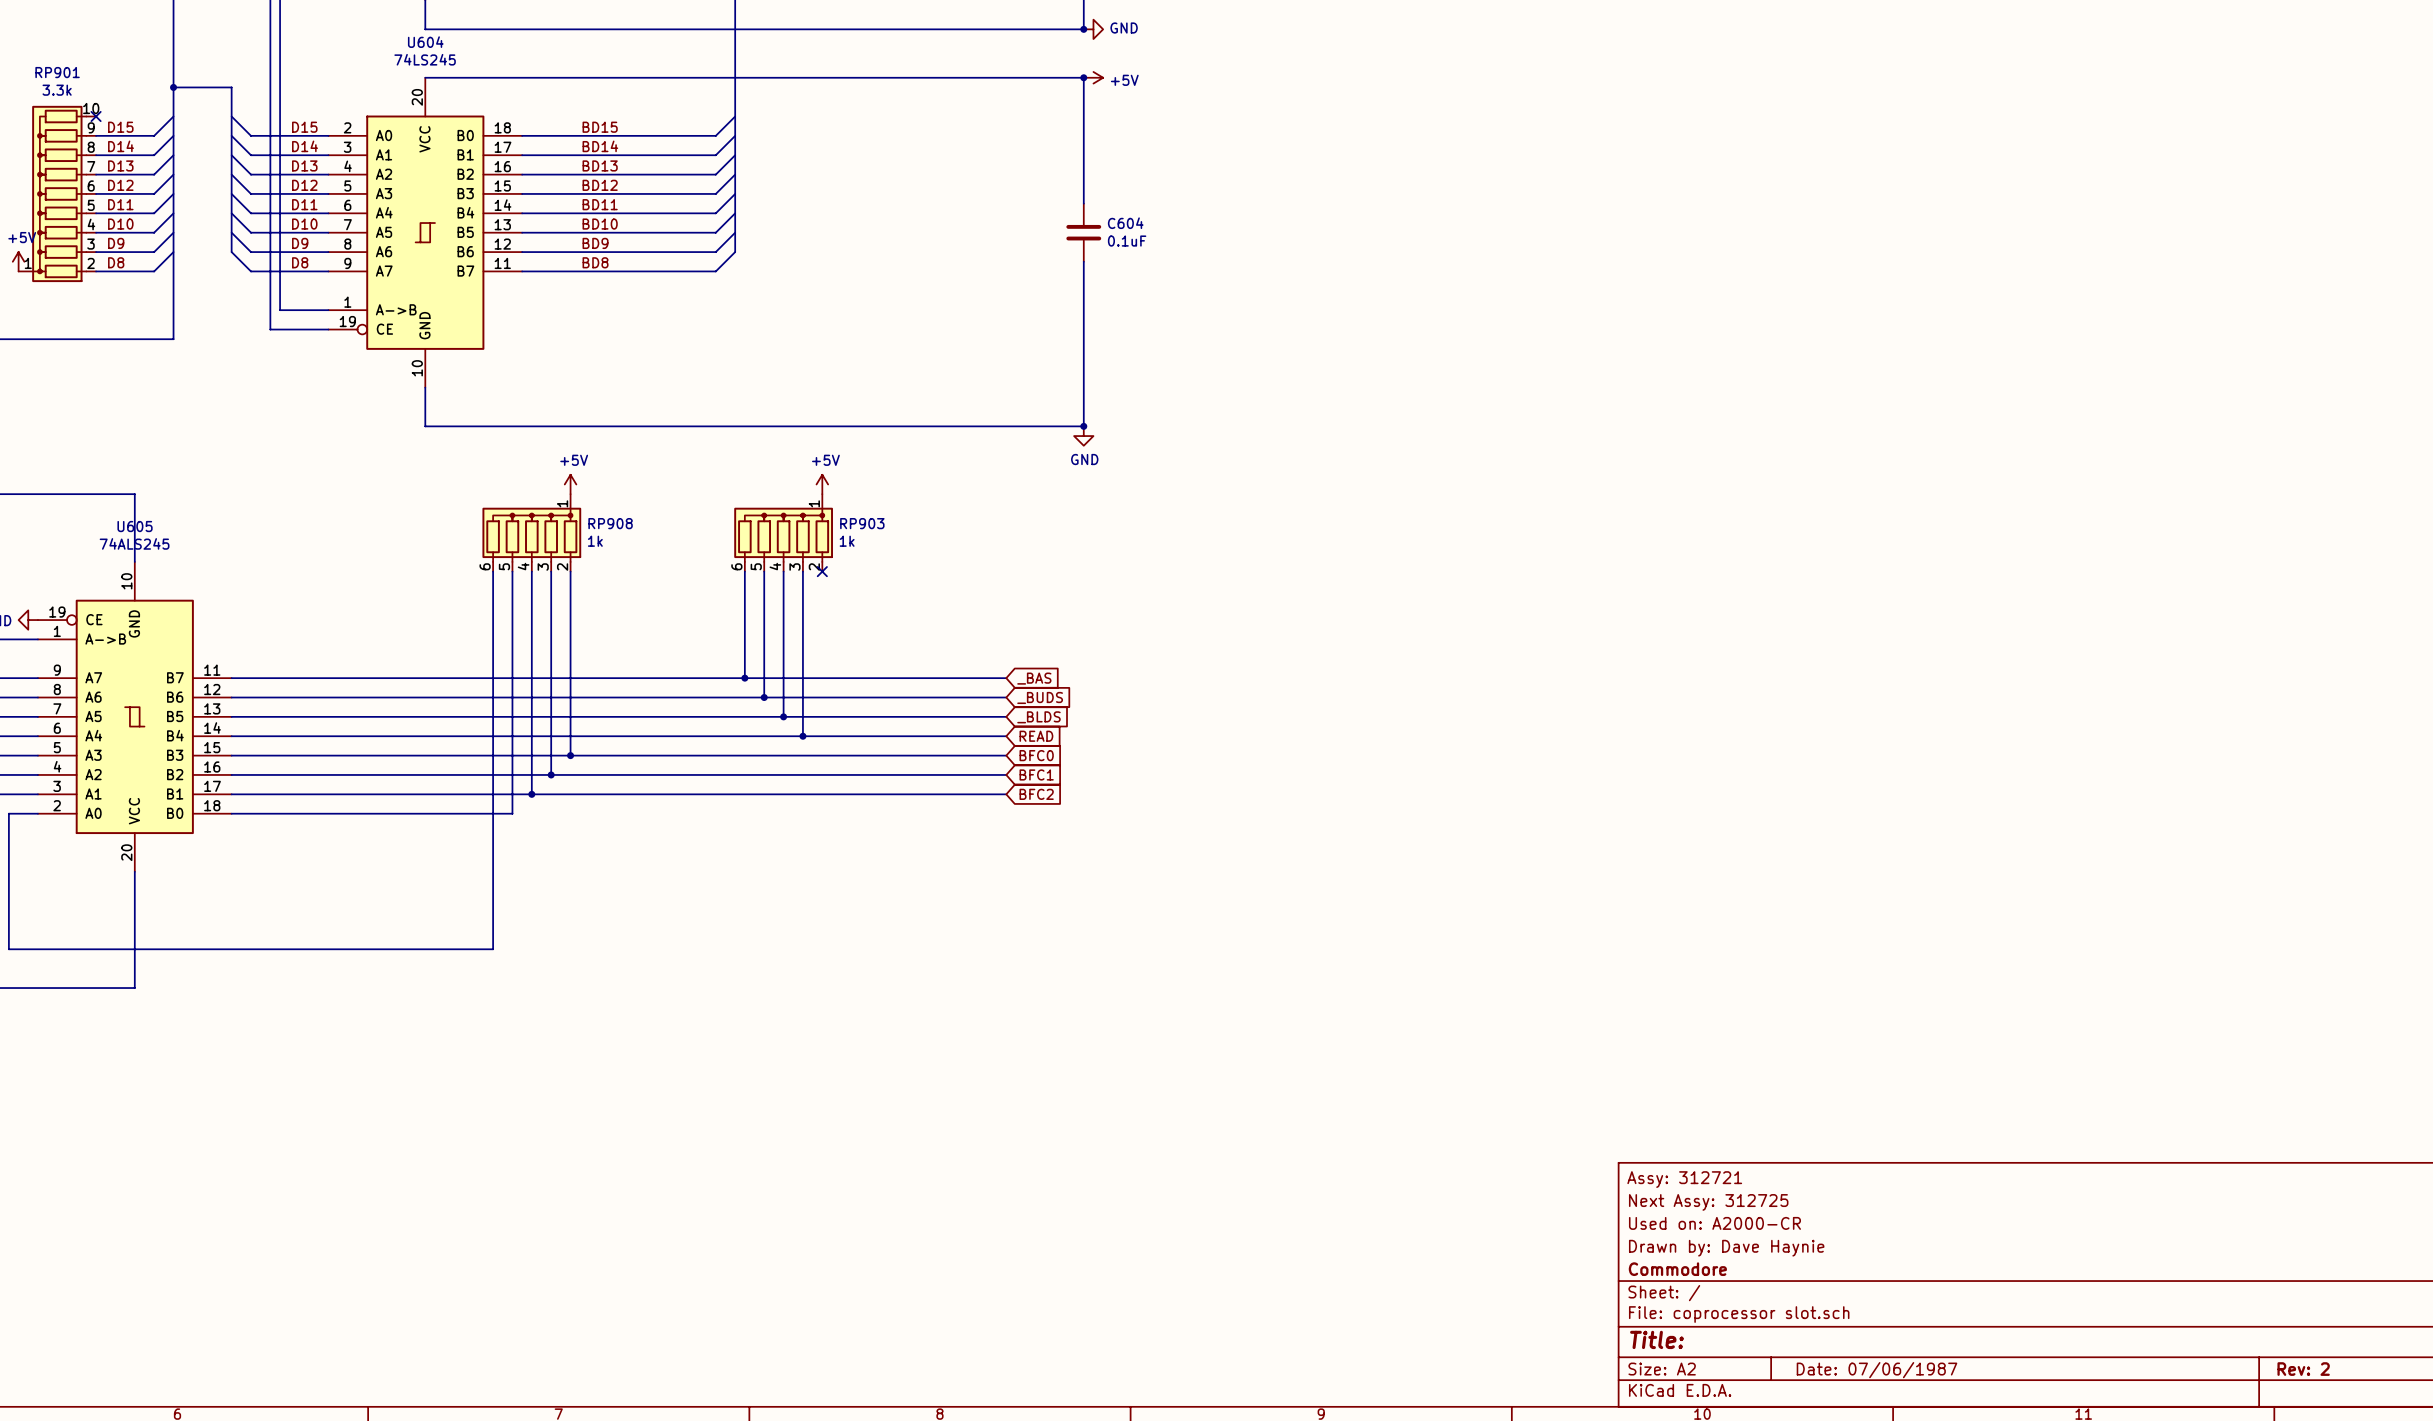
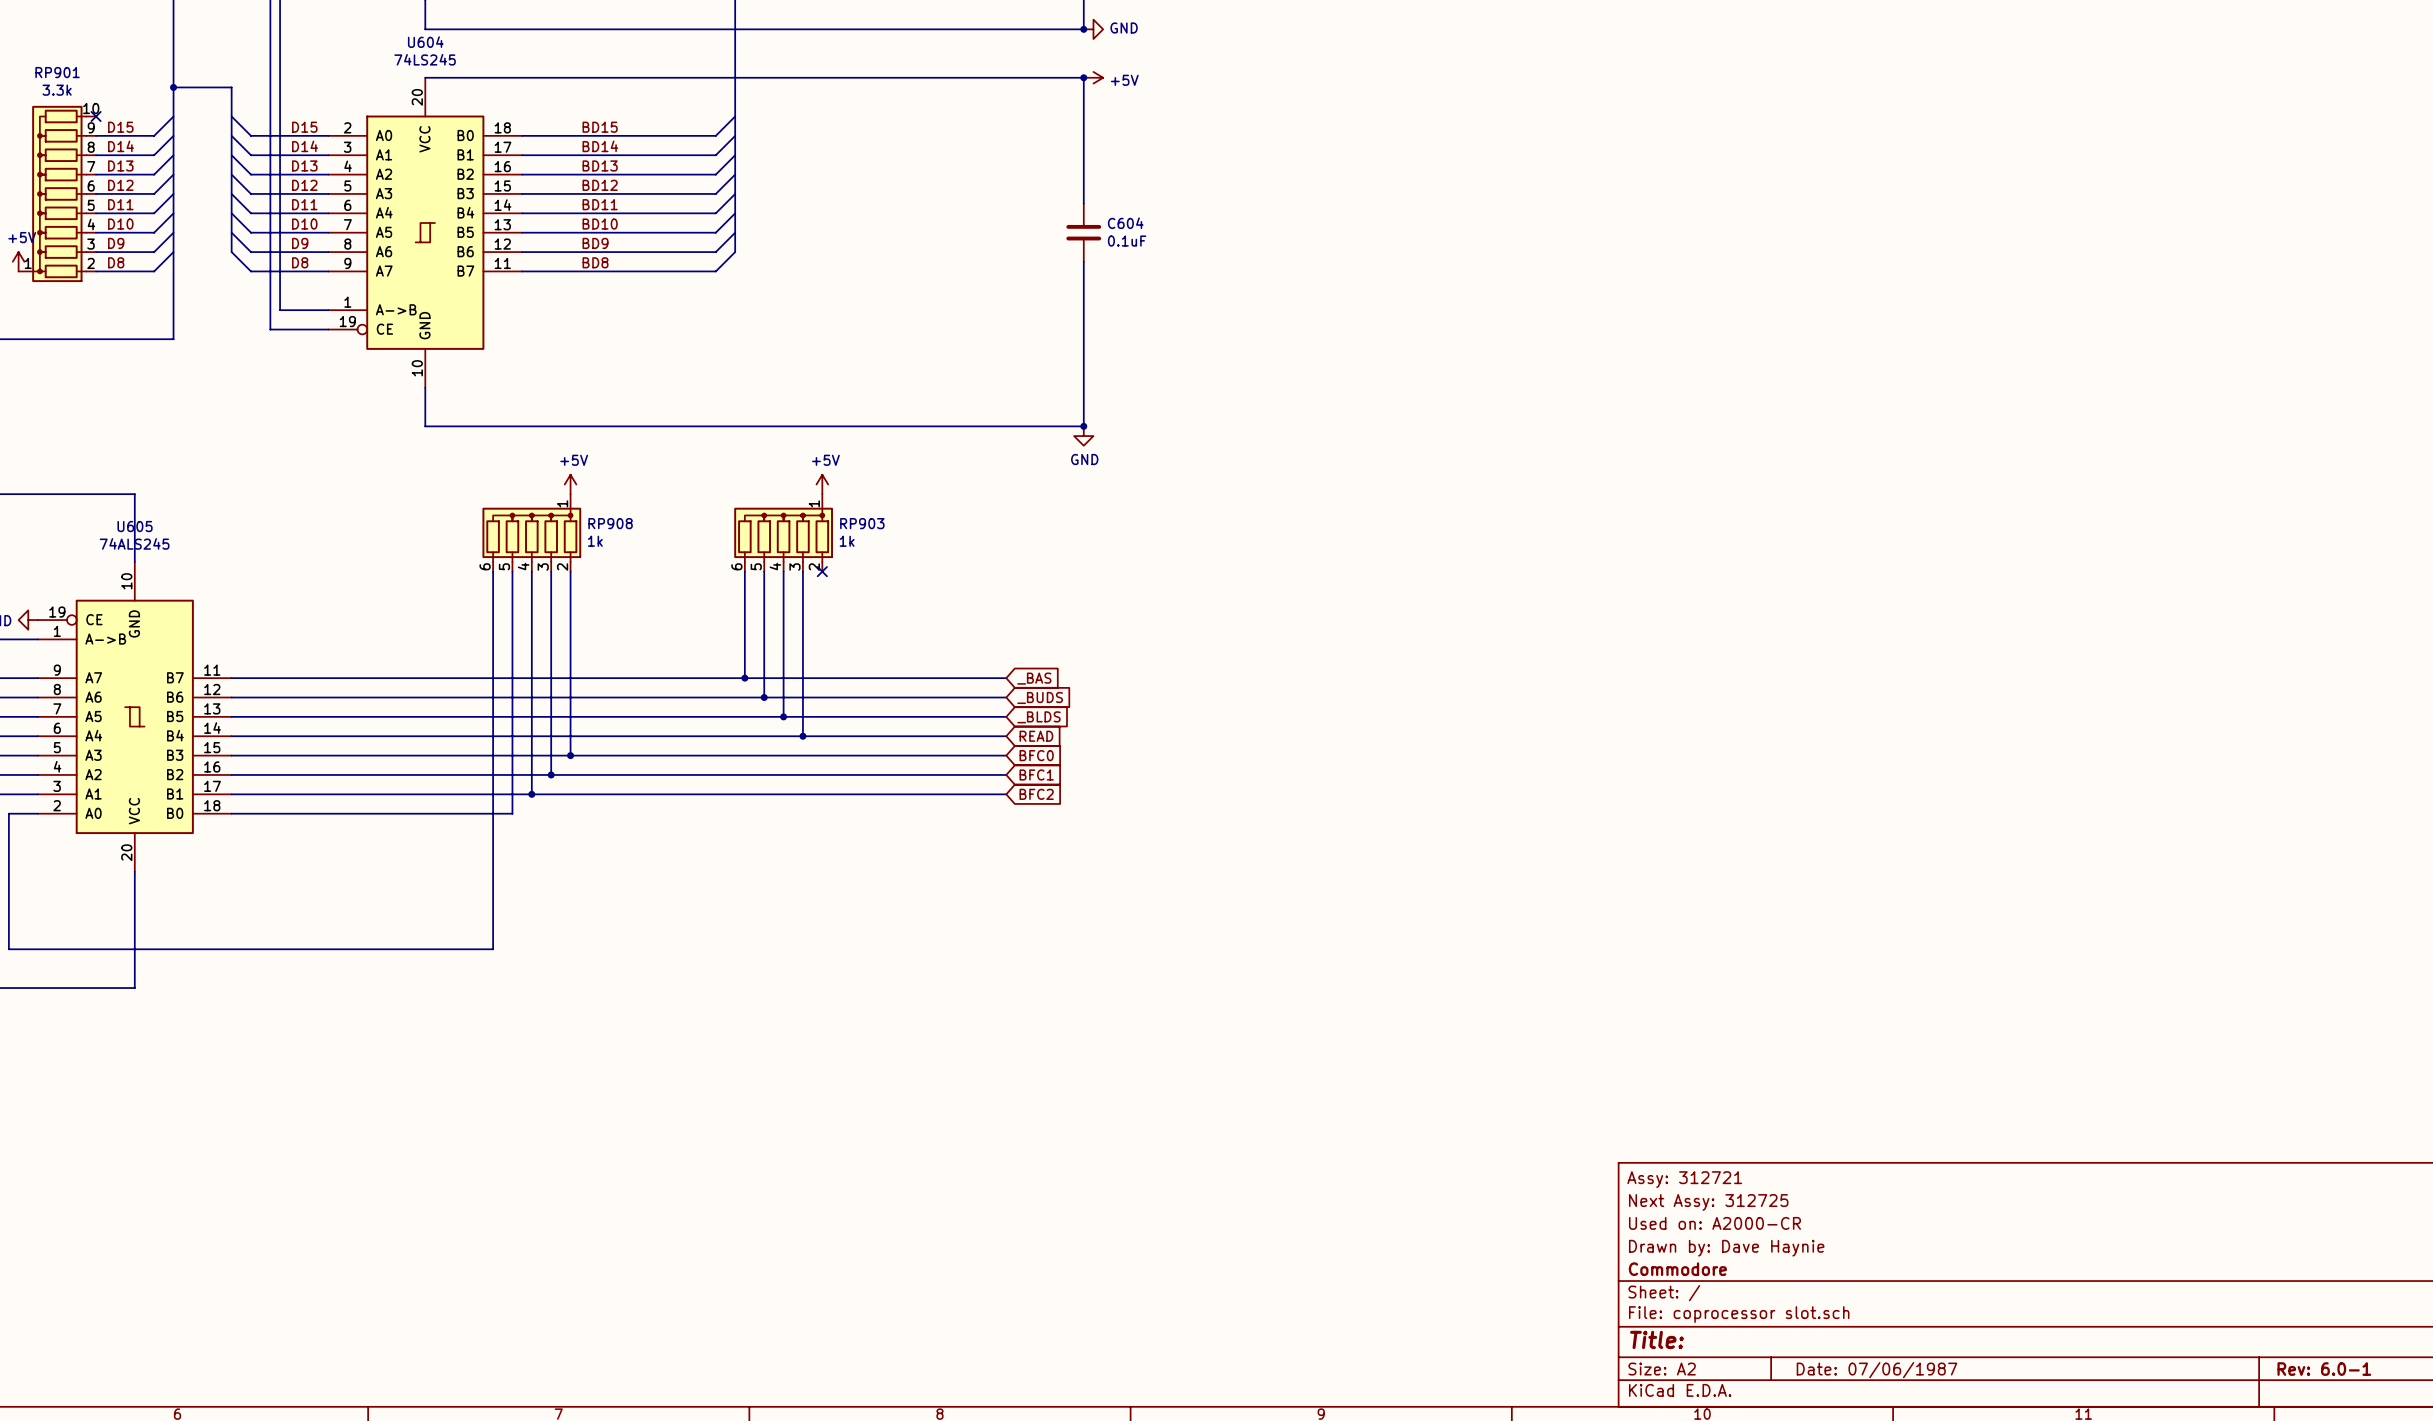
title block: Rev: 2 (2303, 1369) -> Rev: 6.0-1 (2324, 1369)

